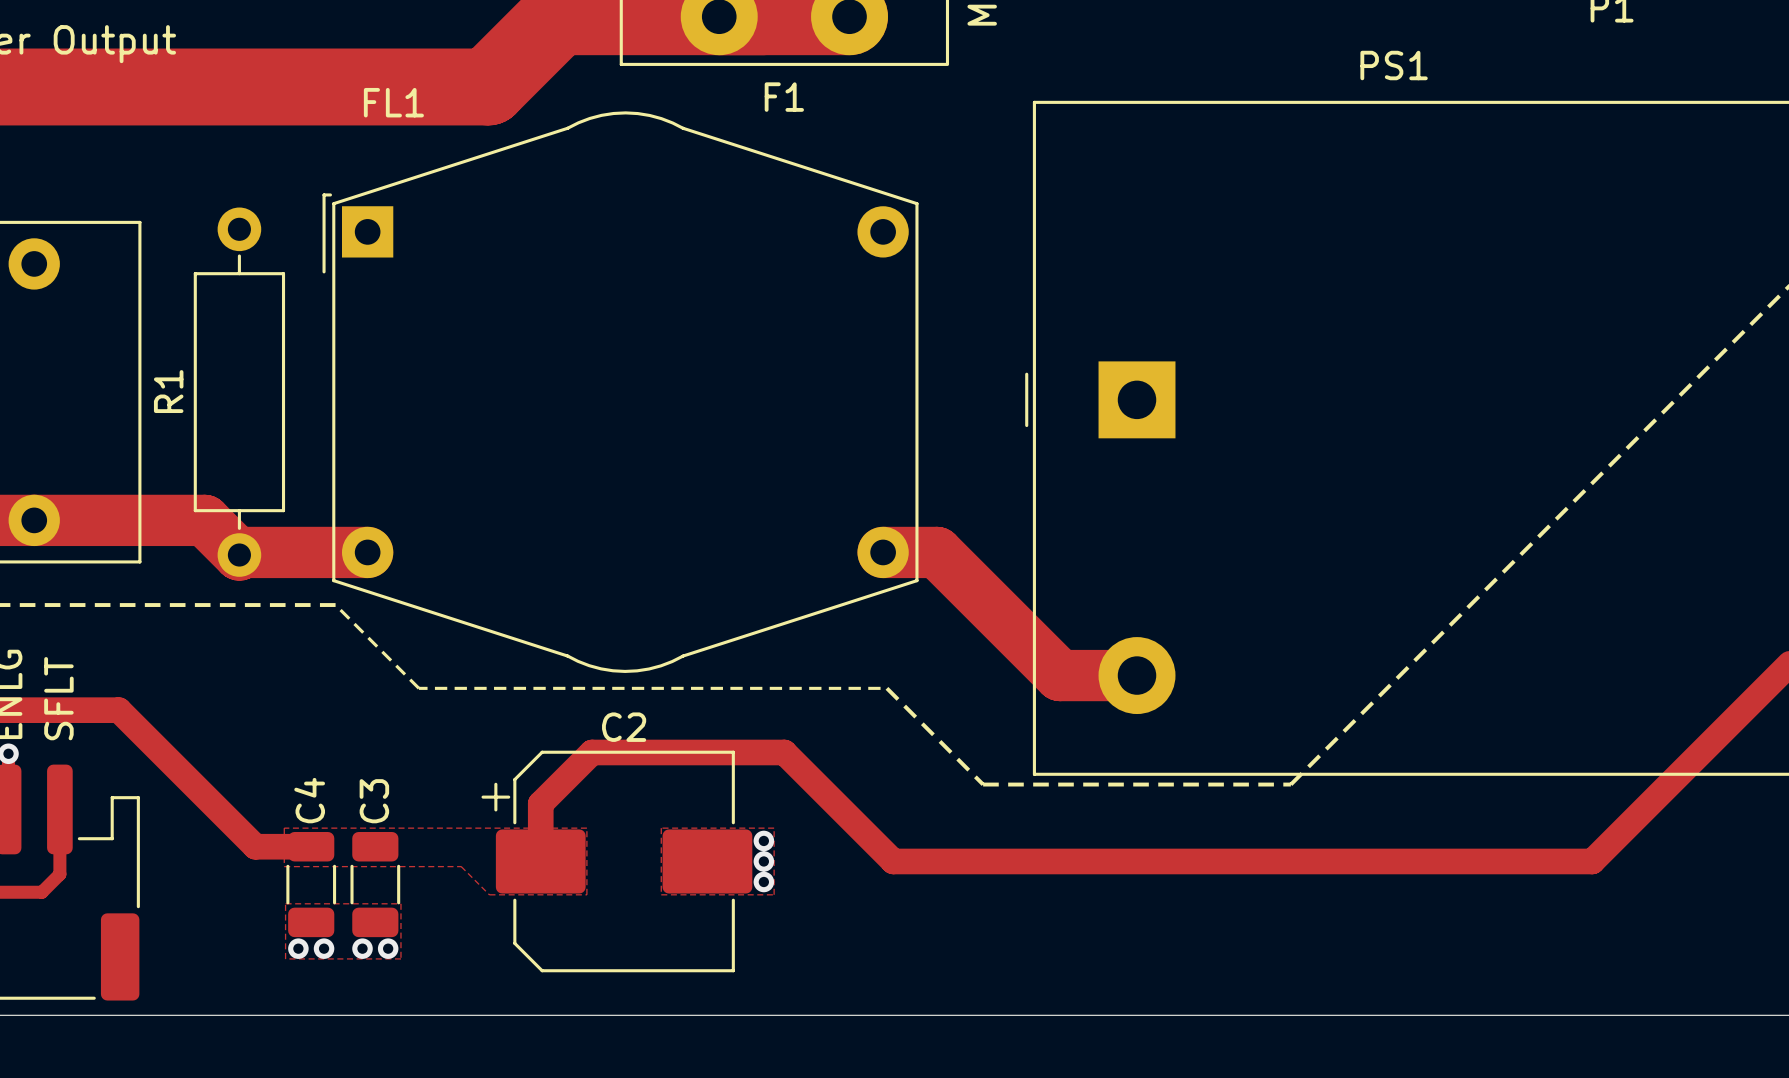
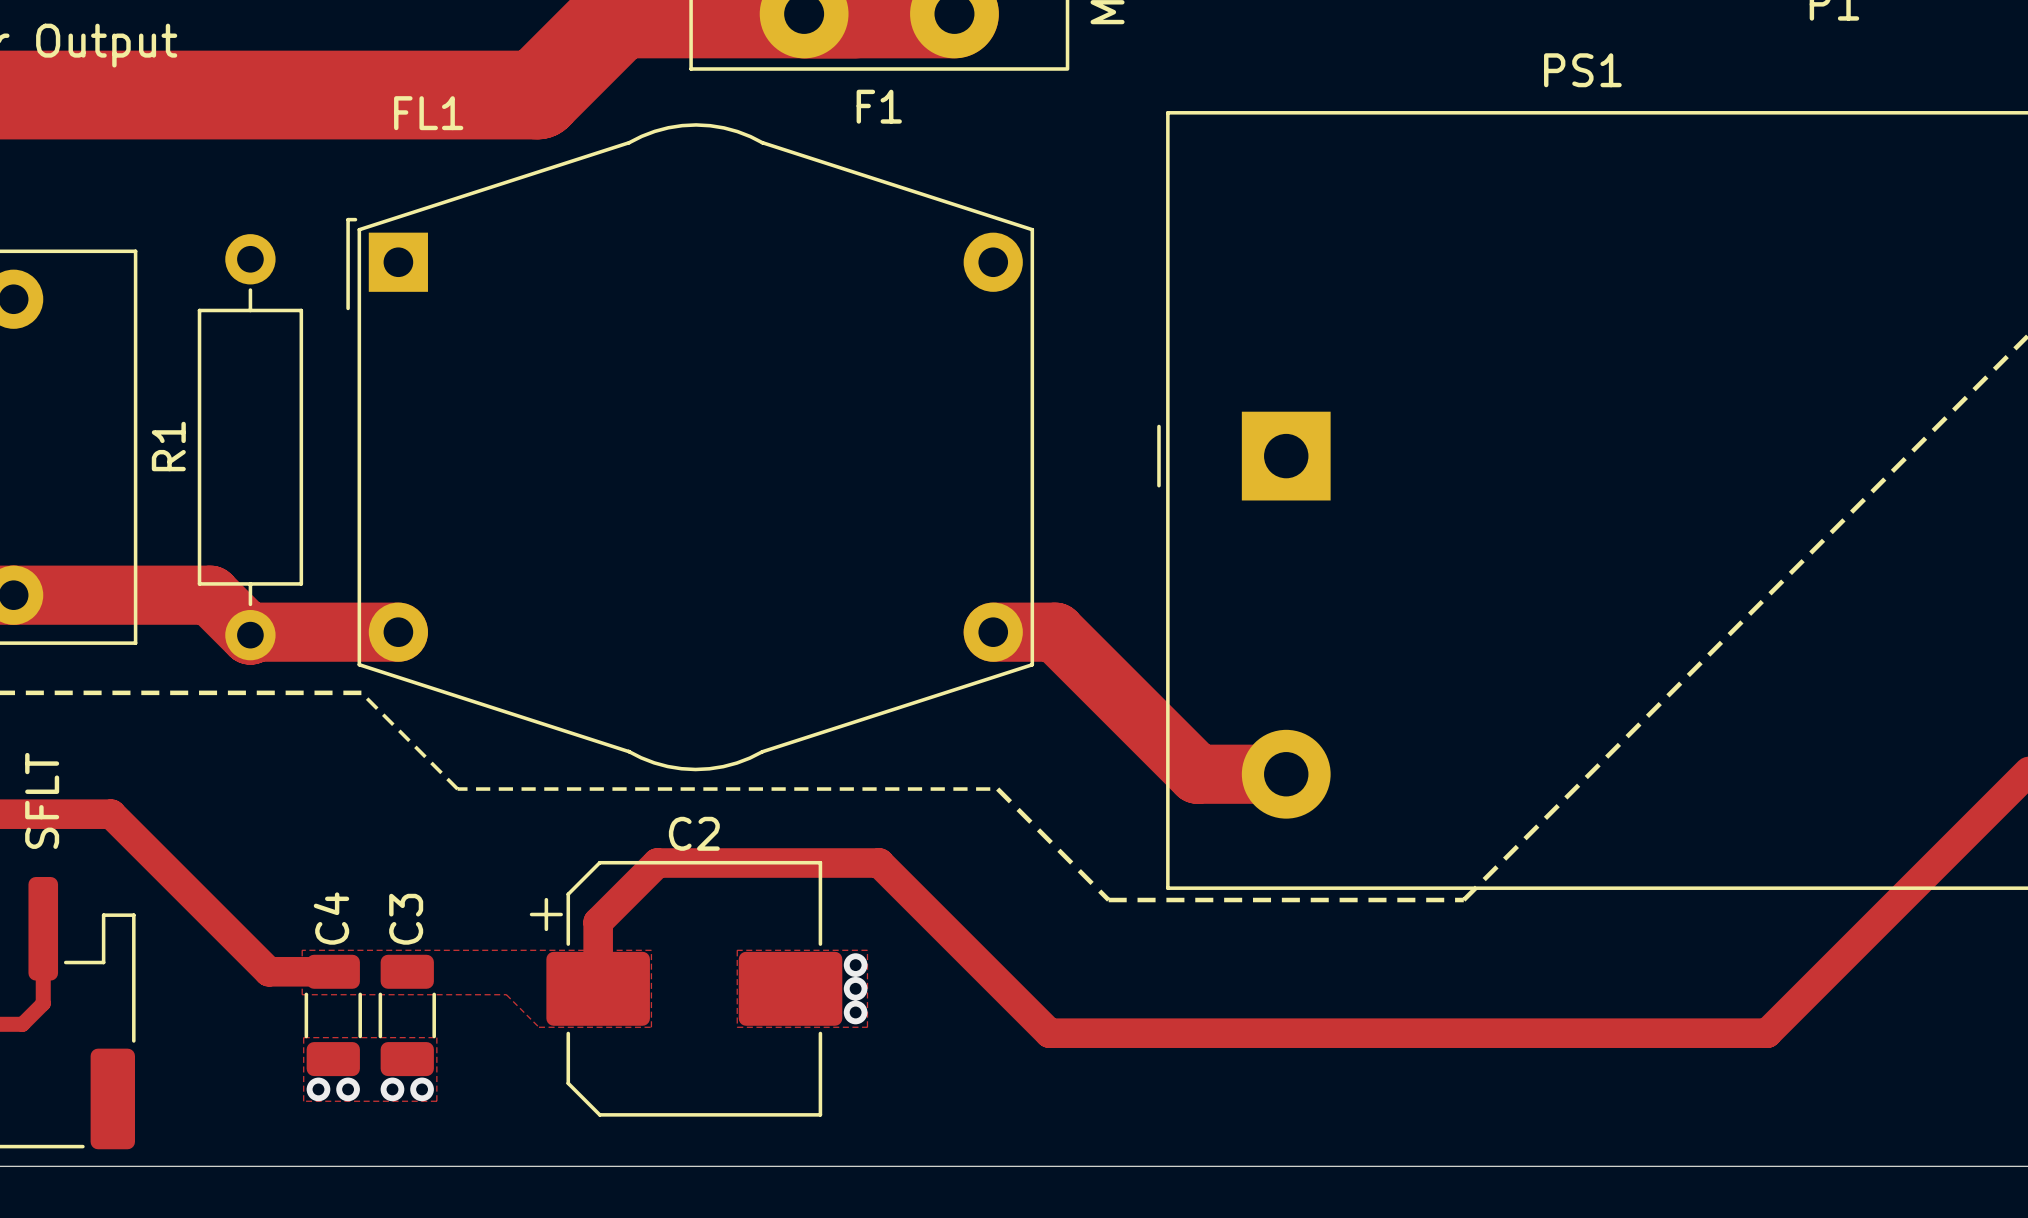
track: (893, 861) (1592, 861) -> (1005, 988) (1049, 1033) (1767, 1033) (1811, 988)

